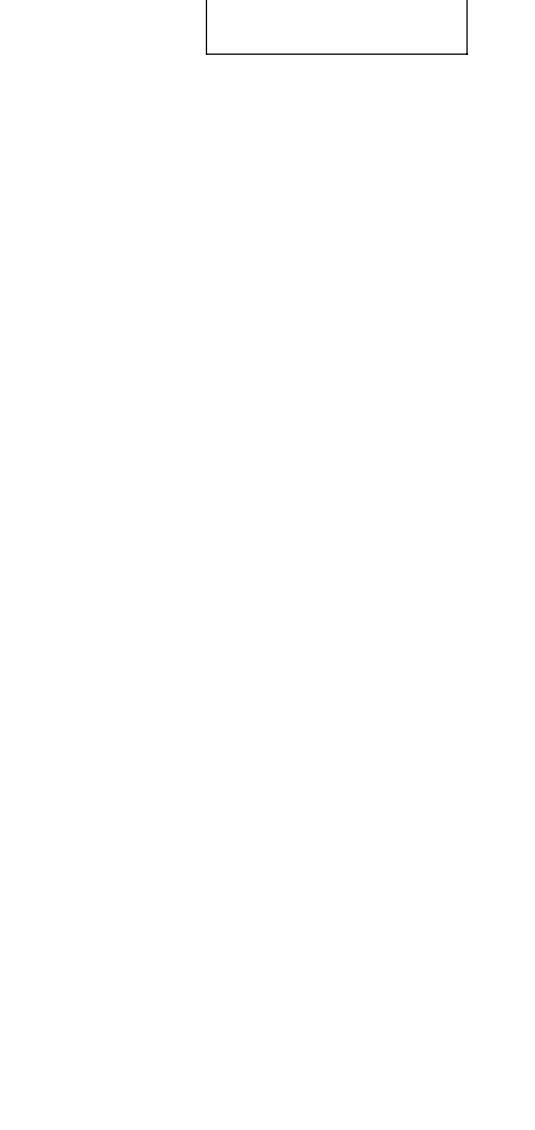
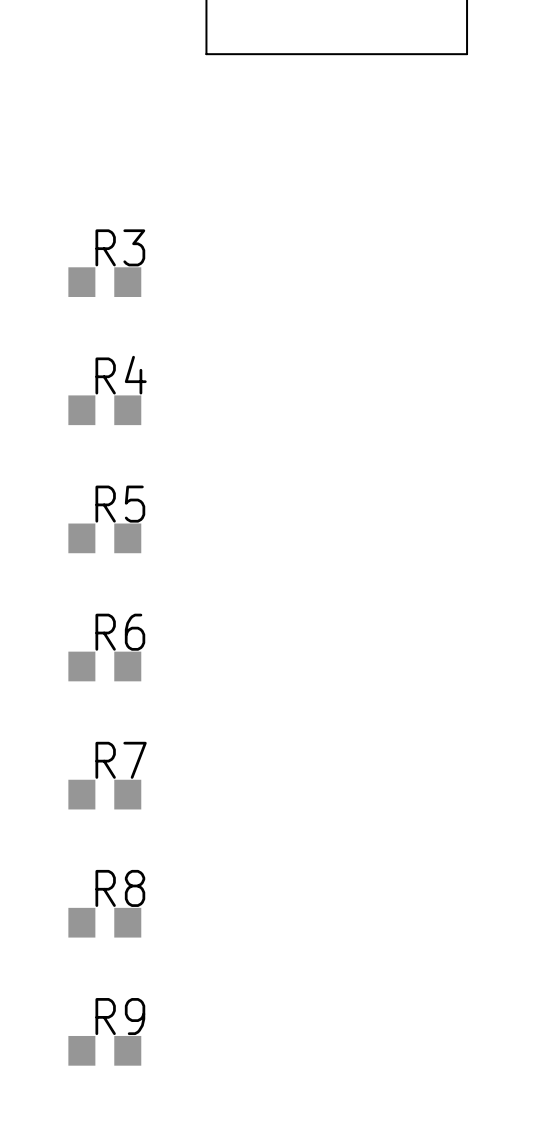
R3: none -> (104, 282)
R4: none -> (104, 410)
R5: none -> (104, 538)
R6: none -> (104, 666)
R7: none -> (104, 794)
R8: none -> (104, 922)
R9: none -> (104, 1050)

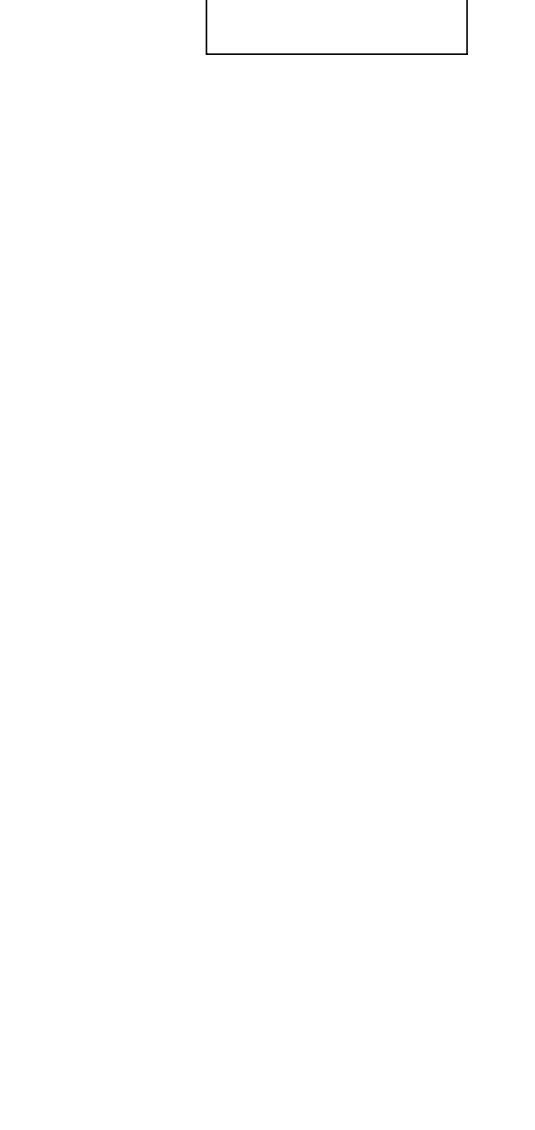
R3: (104, 282) -> none
R4: (104, 410) -> none
R5: (104, 538) -> none
R6: (104, 666) -> none
R7: (104, 794) -> none
R8: (104, 922) -> none
R9: (104, 1050) -> none

